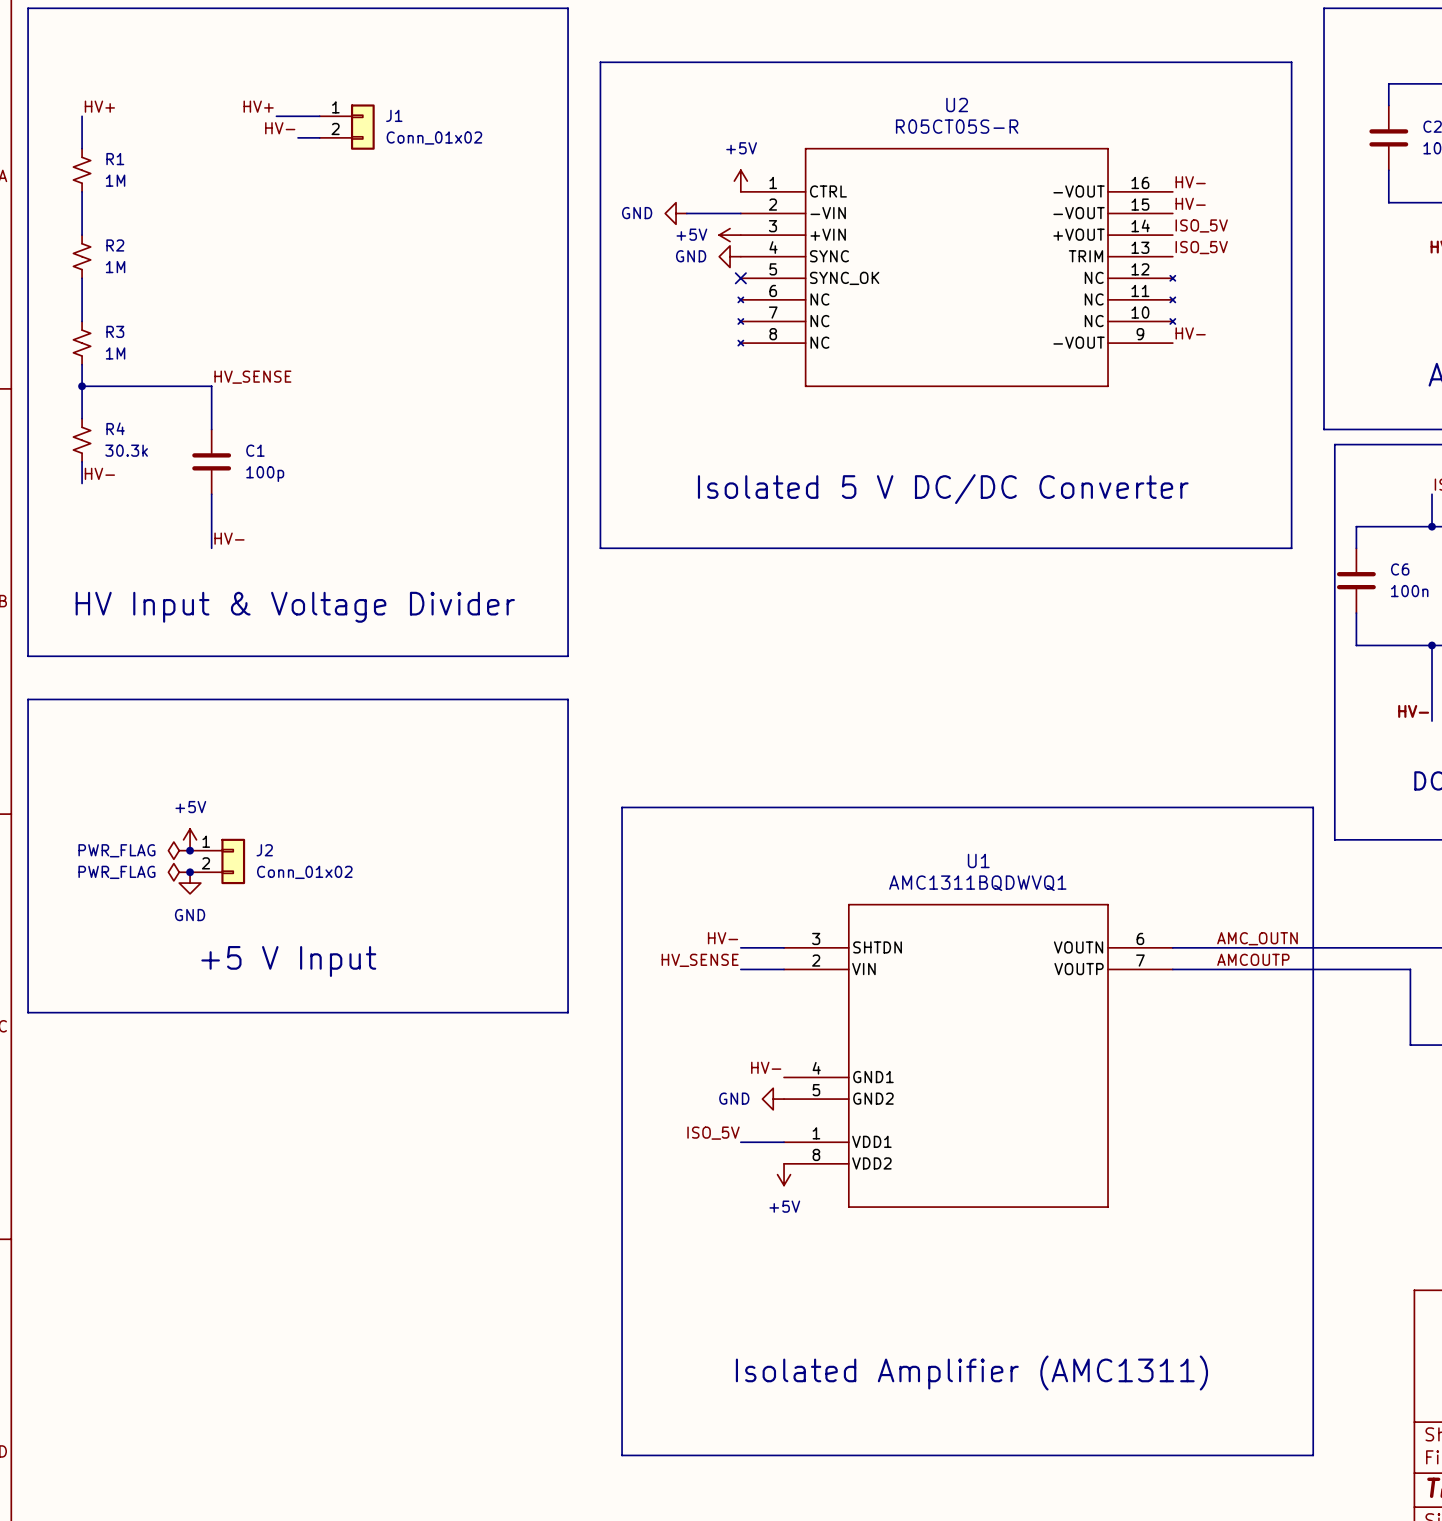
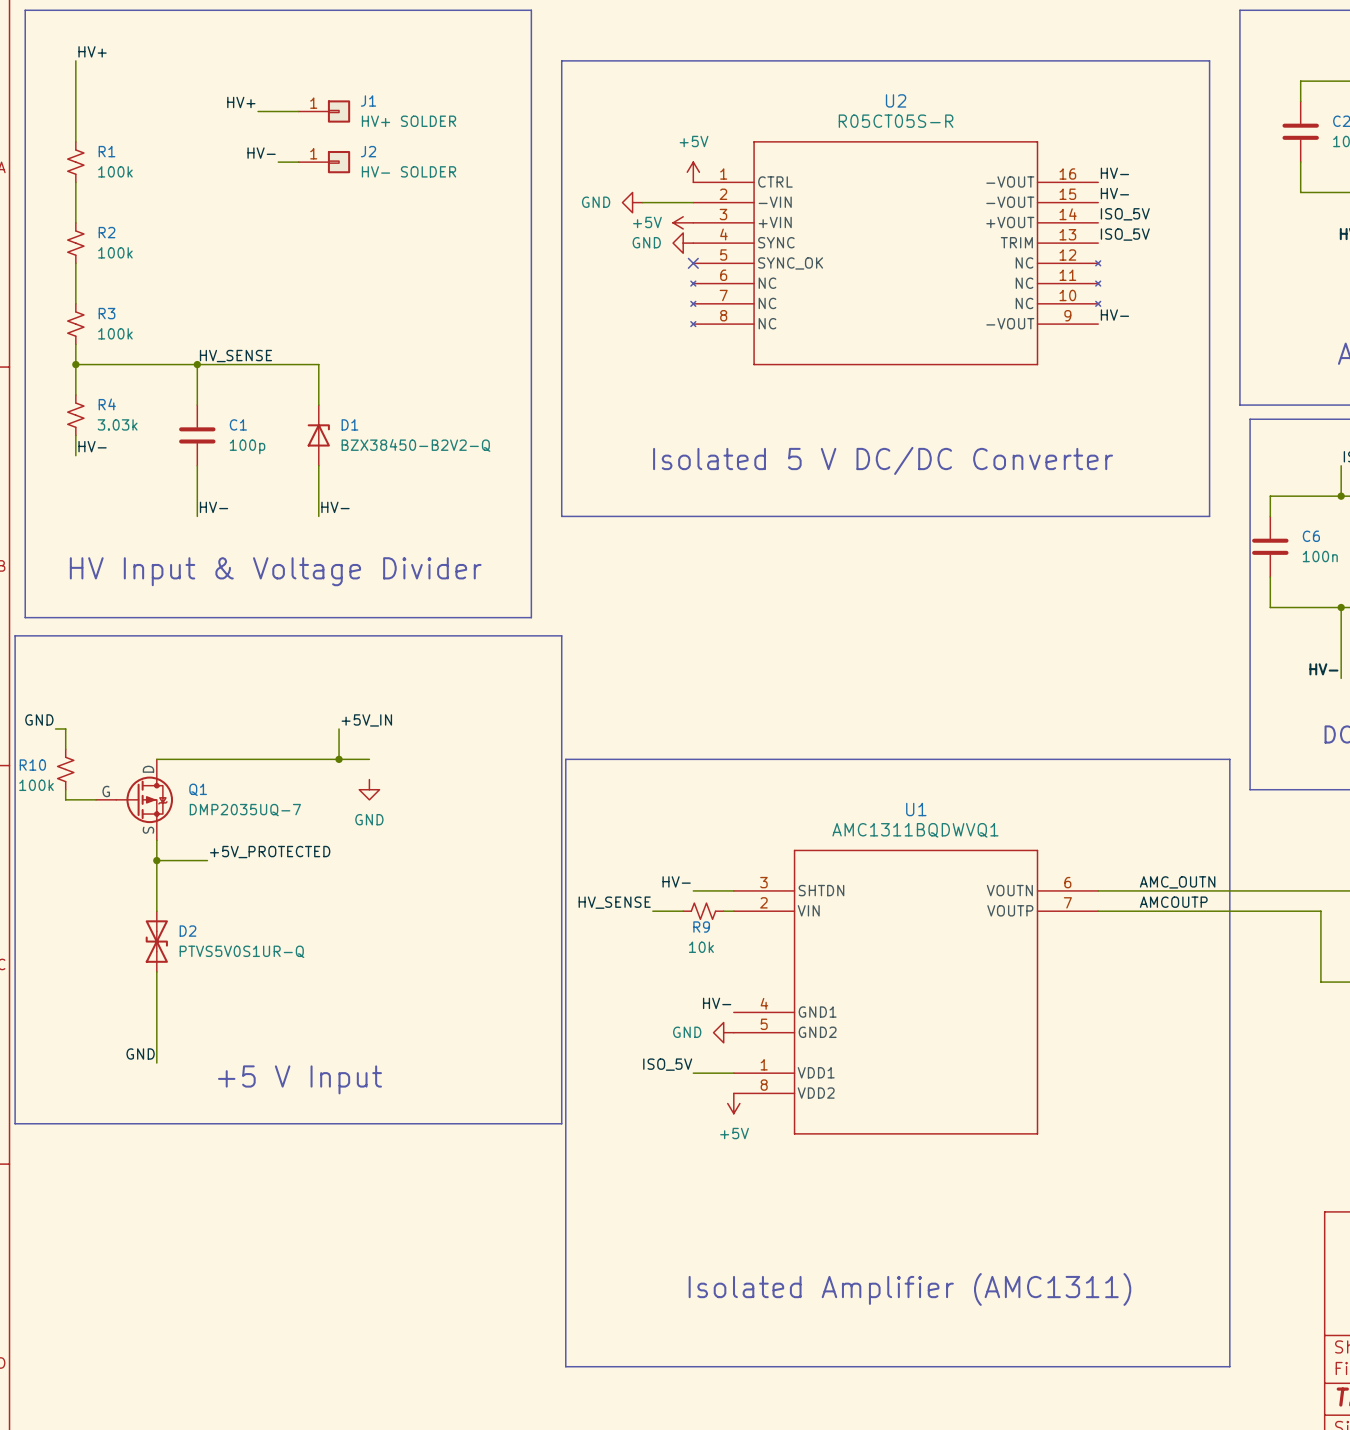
wire: none -> (75, 60) (75, 111)
J1 symbol: [319, 104, 375, 150] -> [298, 100, 351, 123]
label position: HV+ (99, 106) -> HV+ (92, 51)
label position: HV- (280, 128) -> HV- (261, 153)
wire: (298, 137) (319, 137) -> (278, 162) (298, 162)
J1 value: Conn_01x02 (434, 138) -> HV+ SOLDER (409, 121)
R1 value: 1M (115, 180) -> 100k (115, 171)
R2 value: 1M (115, 267) -> 100k (115, 252)
R3 value: 1M (115, 353) -> 100k (115, 333)
wire: none -> (197, 364) (318, 364) (318, 405)
junction: none -> (197, 364)
R4 value: 30.3k (126, 450) -> 3.03k (117, 424)
D1: none -> BZX38450-B2V2-Q (318, 435)
wire: none -> (318, 465) (318, 516)
label: none -> HV- (335, 507)
line: (28, 699) (568, 699) (568, 1012) (28, 1012) (28, 699) -> (15, 635) (15, 1123) (561, 1123) (561, 635) (15, 635)
label: none -> GND (39, 719)
label: none -> +5V_IN (366, 720)
wire: none -> (55, 728) (65, 728) (65, 749)
wire: none -> (339, 728) (339, 759)
wire: none -> (156, 759) (369, 759)
junction: none -> (339, 759)
line: (622, 807) (622, 1455) -> (581, 759) (565, 759) (565, 1366) (581, 1366)
R10: none -> 100k (65, 769)
J2 symbol: [190, 838, 246, 885] -> [298, 150, 351, 174]
wire: none -> (65, 789) (65, 799) (96, 799)
power symbol: +5V (190, 839) -> none
Q1: none -> DMP2035UQ-7 (134, 799)
power symbol: PWR_FLAG (179, 850) -> none
junction: (190, 850) -> none
power symbol: PWR_FLAG (179, 872) -> none
junction: (190, 872) -> none
J2 value: Conn_01x02 (304, 872) -> HV- SOLDER (409, 171)
power symbol position: GND (190, 883) -> GND (369, 789)
wire: none -> (156, 840) (156, 911)
label: none -> +5V_PROTECTED (270, 852)
wire: none -> (156, 860) (207, 860)
junction: none -> (156, 860)
label position: HV_SENSE (700, 960) -> HV_SENSE (614, 902)
text position: +5 V Input (288, 961) -> +5 V Input (299, 1079)
wire: (740, 969) (773, 969) -> (652, 911) (683, 911)
R9: none -> 10k (703, 911)
D2: none -> PTVS5V0S1UR-Q (156, 941)
wire: none -> (156, 971) (156, 1063)
label: none -> GND (140, 1054)

